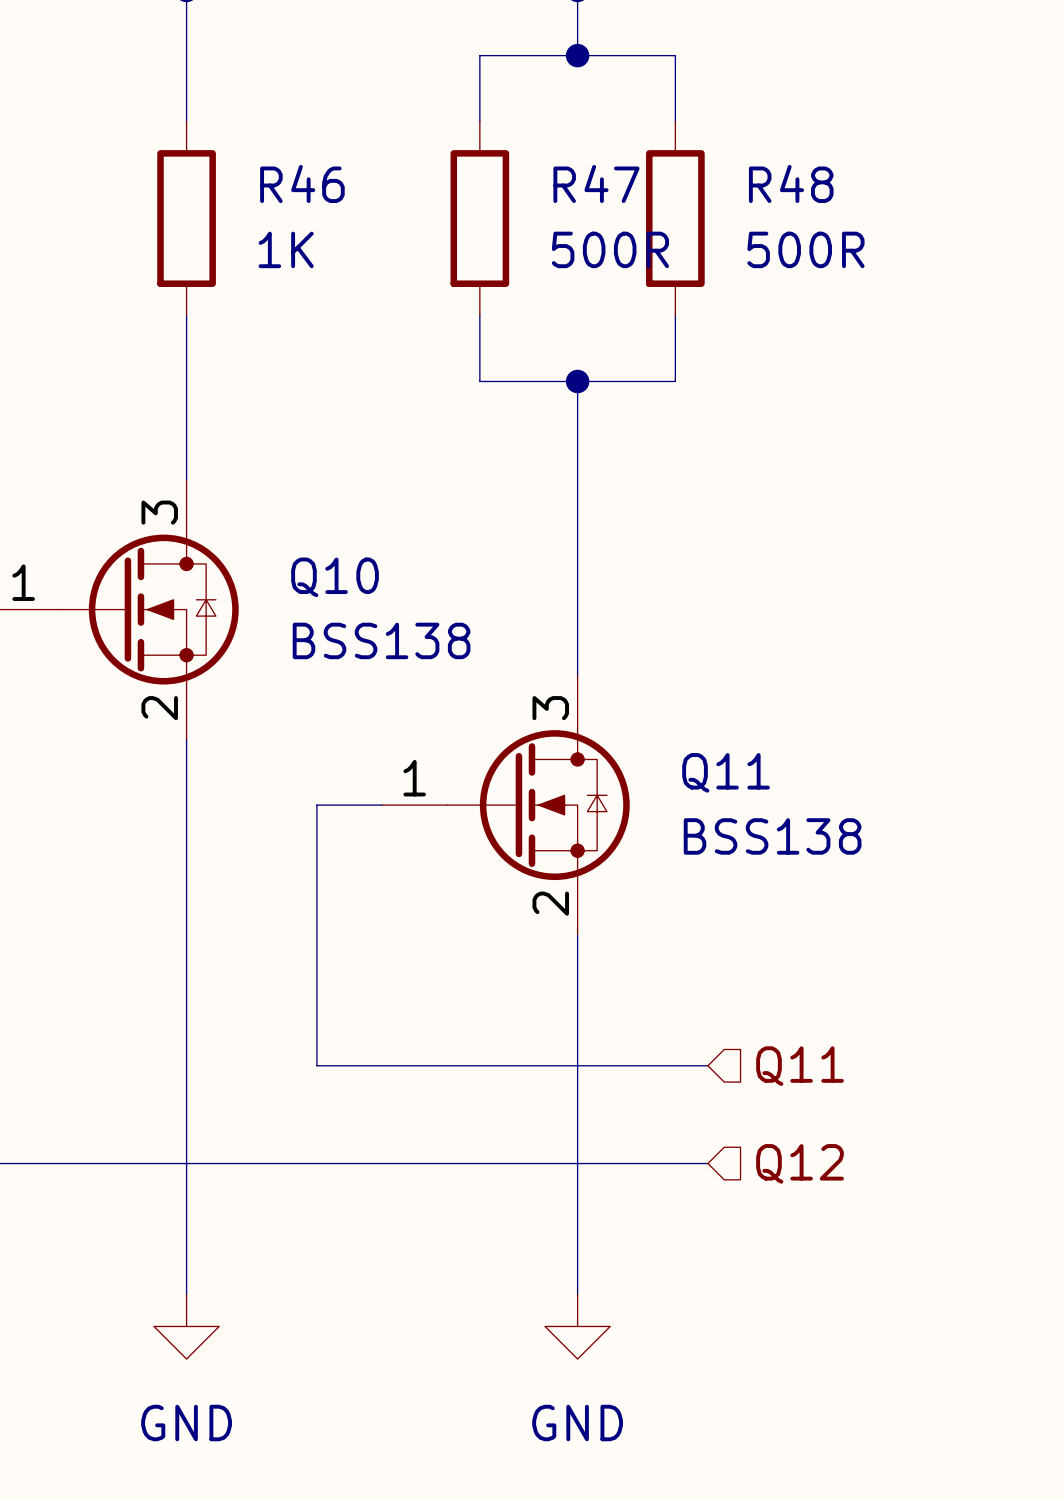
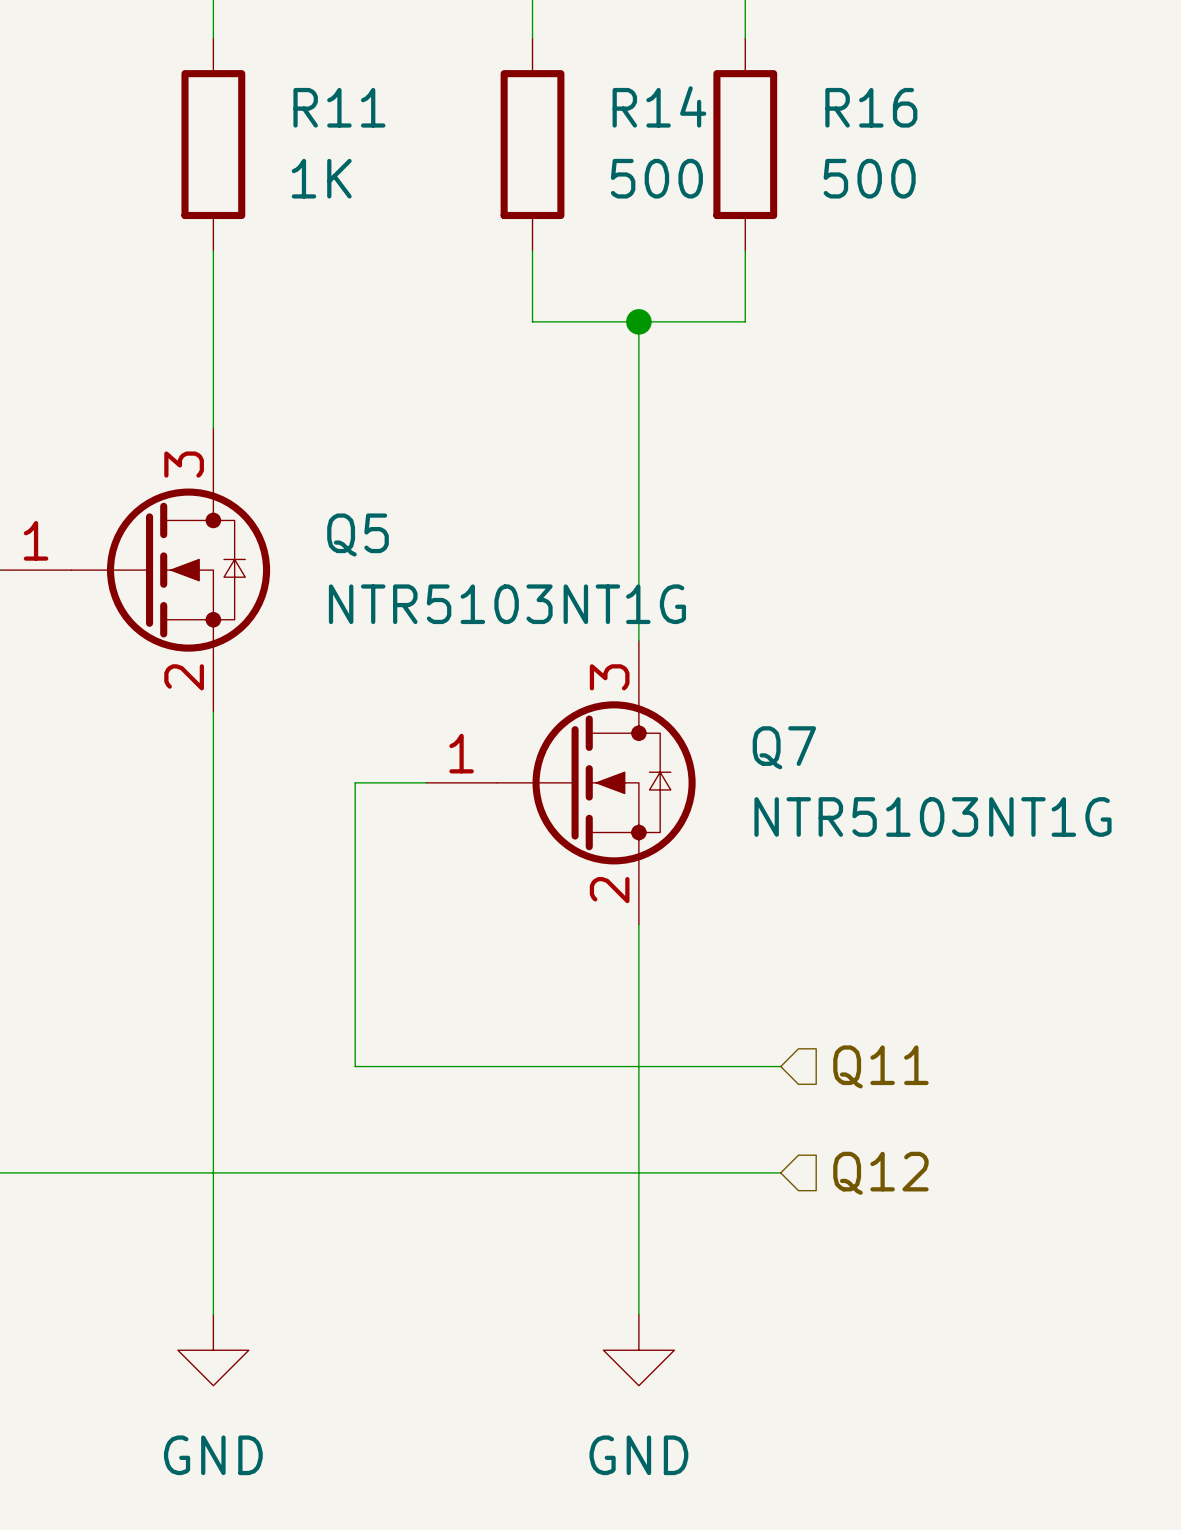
R46 name: R46 (302, 183) -> R11 (339, 107)
R47 name: R47 (596, 183) -> R14 (659, 106)
R48 name: R48 (791, 183) -> R16 (871, 107)
R47 value: 500R (610, 249) -> 500 (656, 178)
R48 value: 500R (805, 249) -> 500 (869, 178)
Q10 name: Q10 (335, 577) -> Q5 (358, 534)
Q10 value: BSS138 (381, 640) -> NTR5103NT1G (507, 604)
Q11 name: Q11 (726, 772) -> Q7 (784, 747)
Q11 value: BSS138 (772, 836) -> NTR5103NT1G (932, 817)

